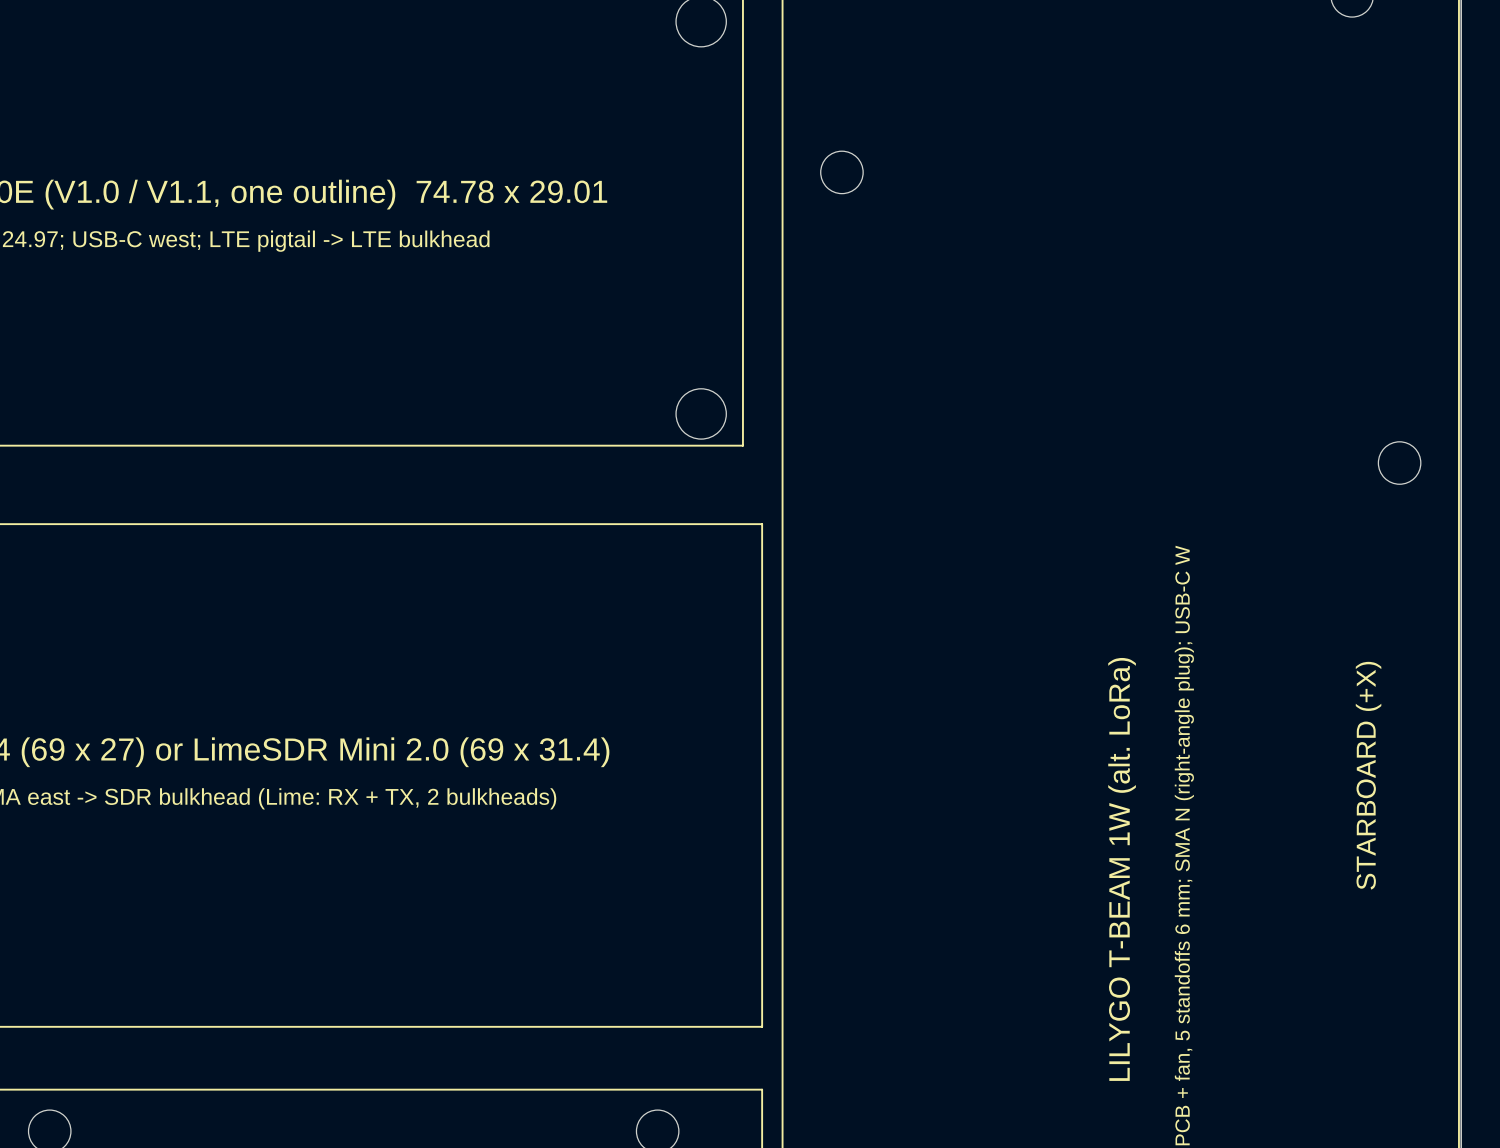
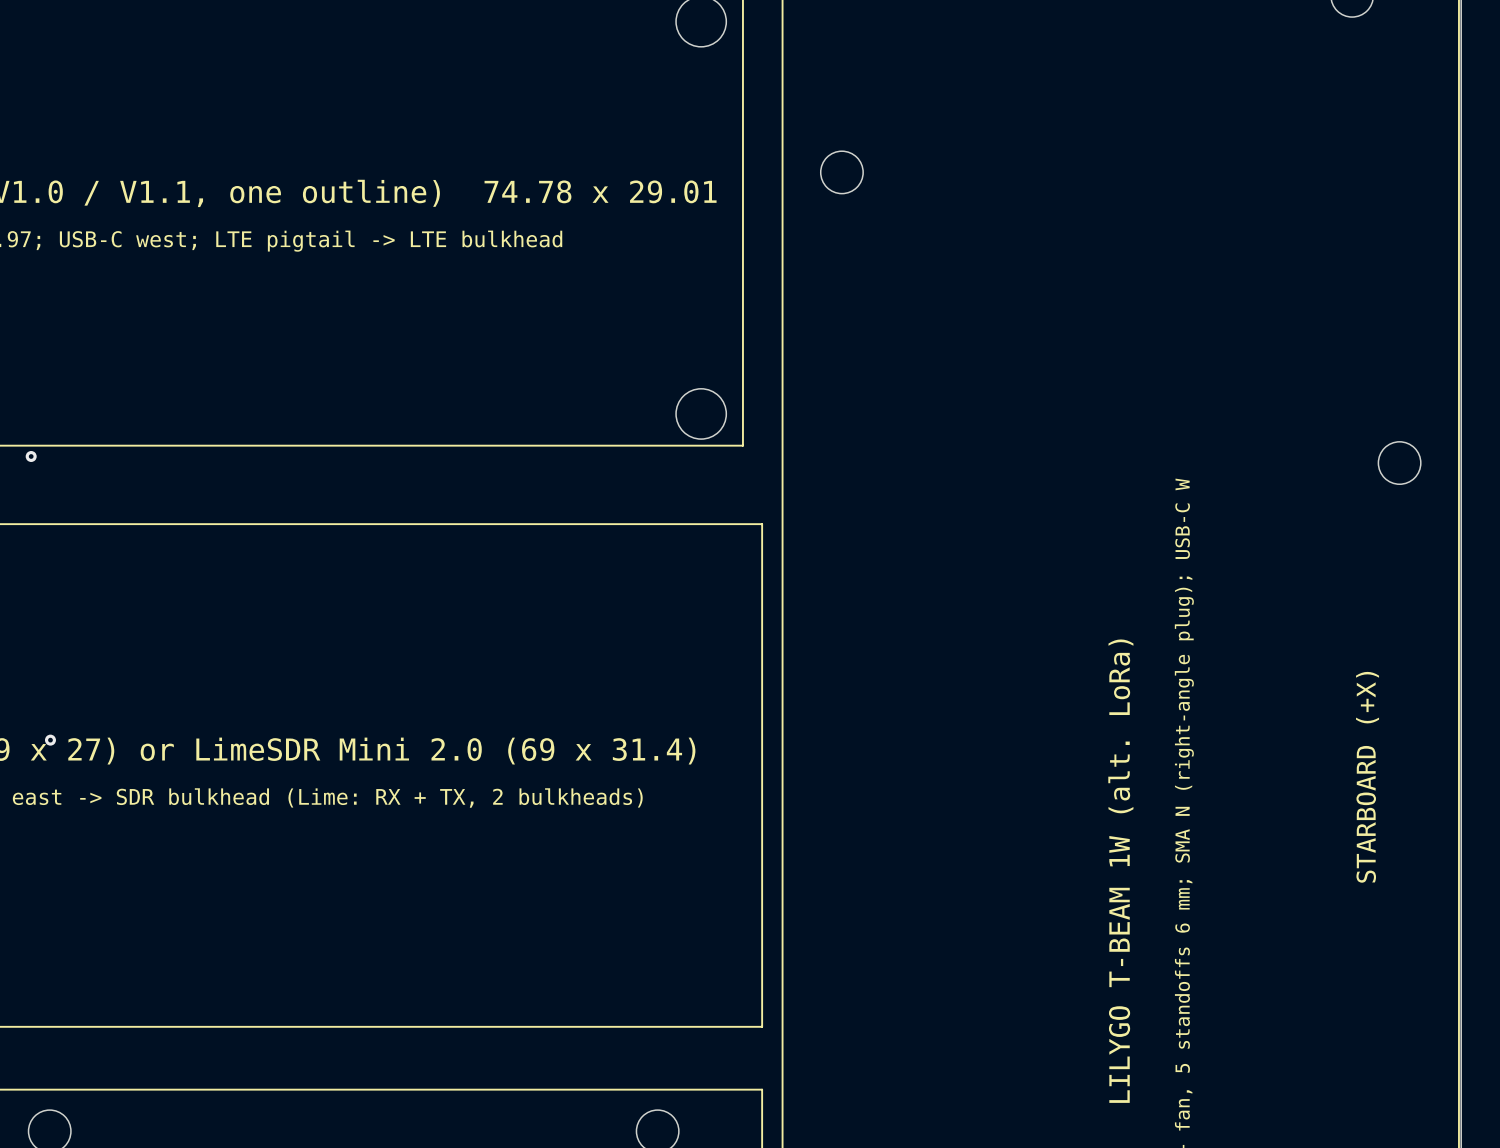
via: none -> (31, 456)
via: none -> (50, 740)

